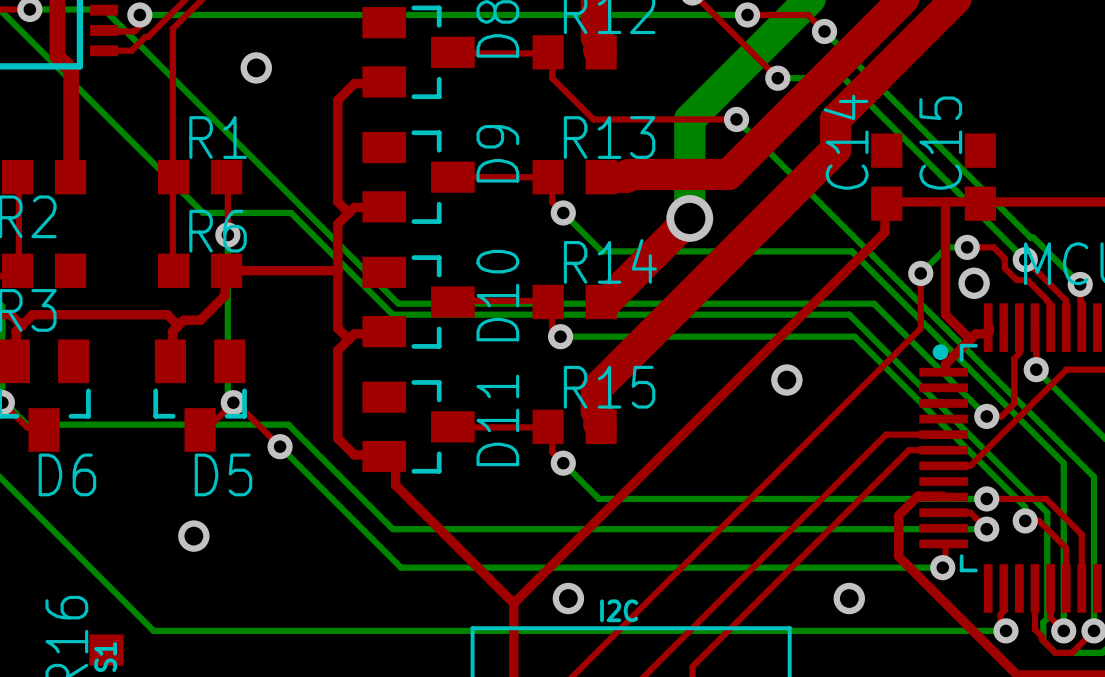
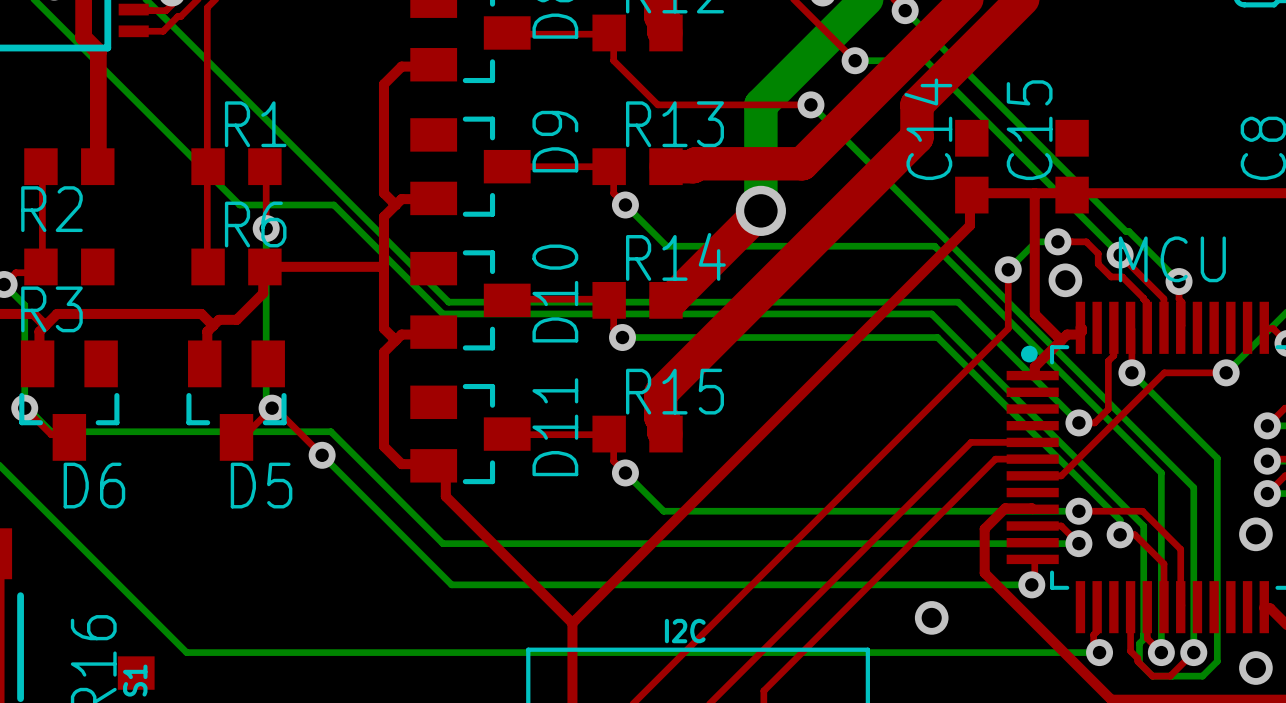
via: (256, 67) -> none
via: (786, 380) -> none
via: (193, 536) -> none
via: (568, 598) -> none

